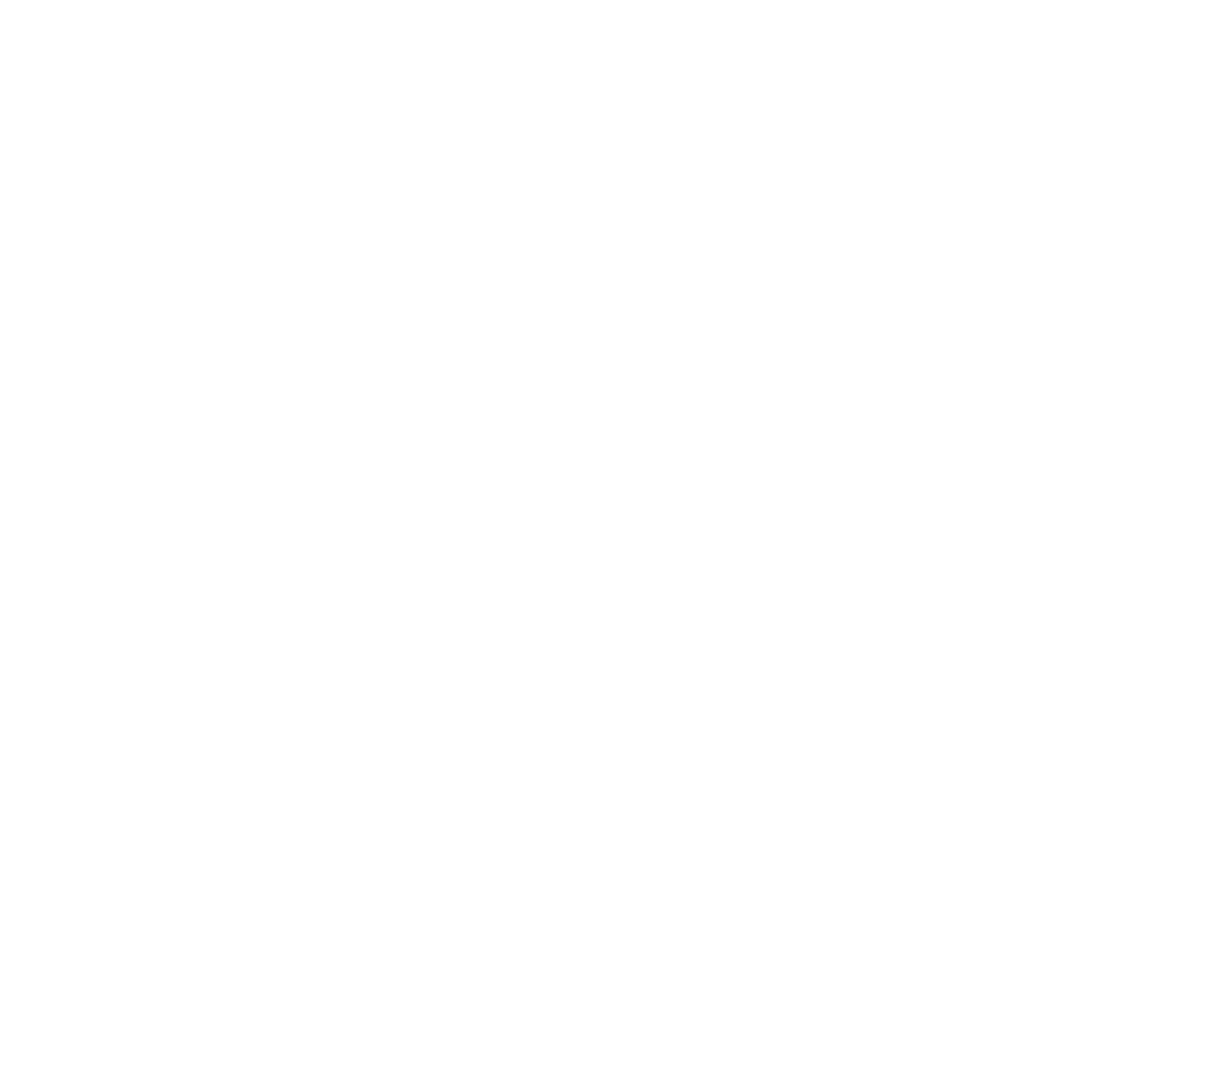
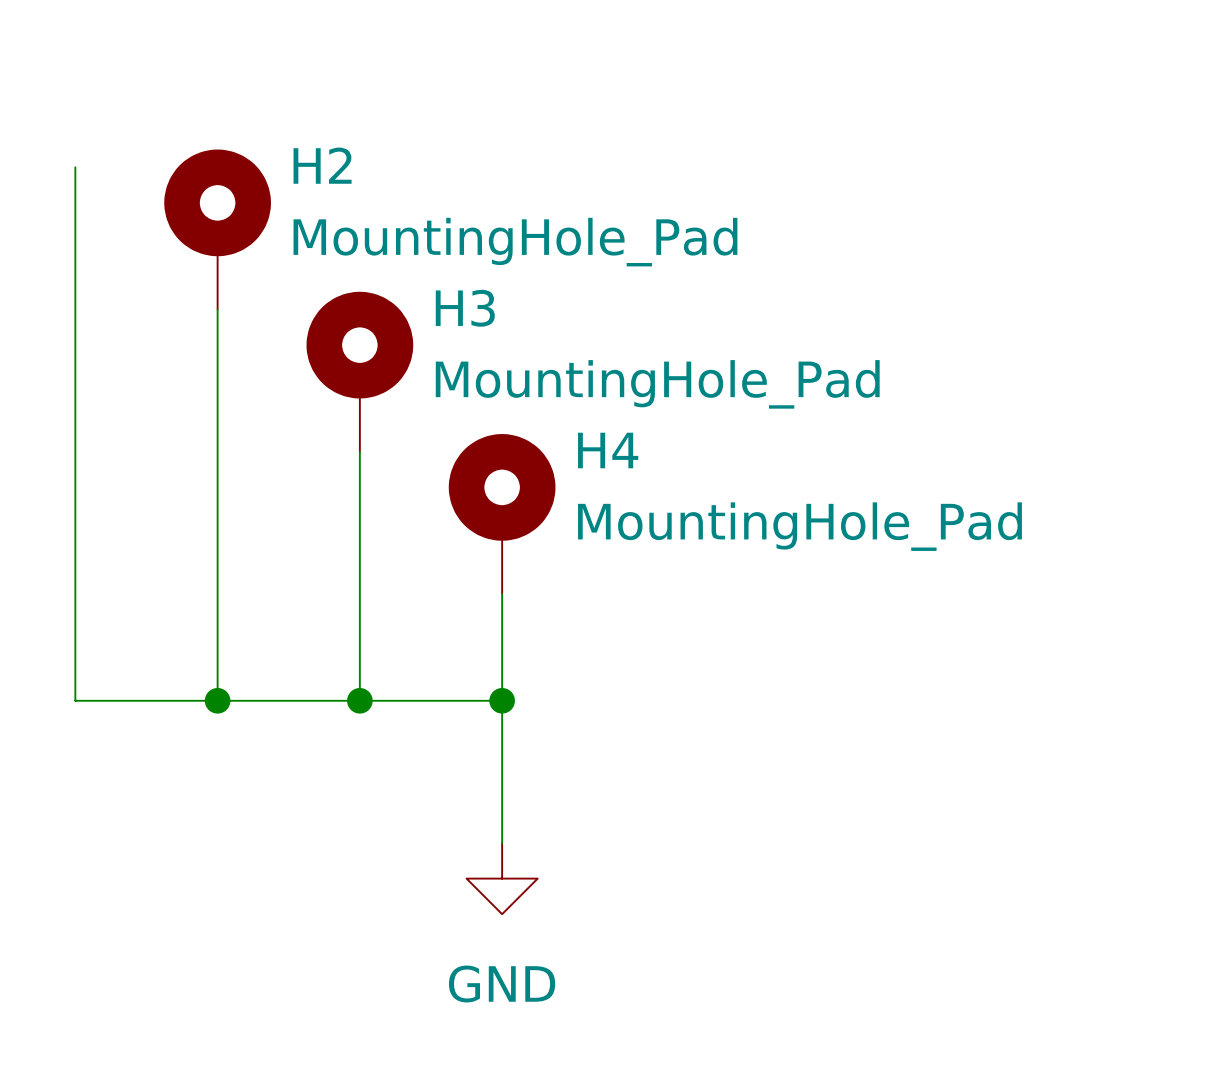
wire: none -> (75, 167) (75, 700) (502, 700)
H2: none -> MountingHole_Pad (217, 229)
wire: none -> (217, 309) (217, 700)
H3: none -> MountingHole_Pad (359, 371)
wire: none -> (359, 451) (359, 700)
H4: none -> MountingHole_Pad (502, 514)
wire: none -> (502, 594) (502, 843)
junction: none -> (217, 700)
junction: none -> (359, 700)
junction: none -> (502, 700)
power symbol: none -> GND (502, 878)

